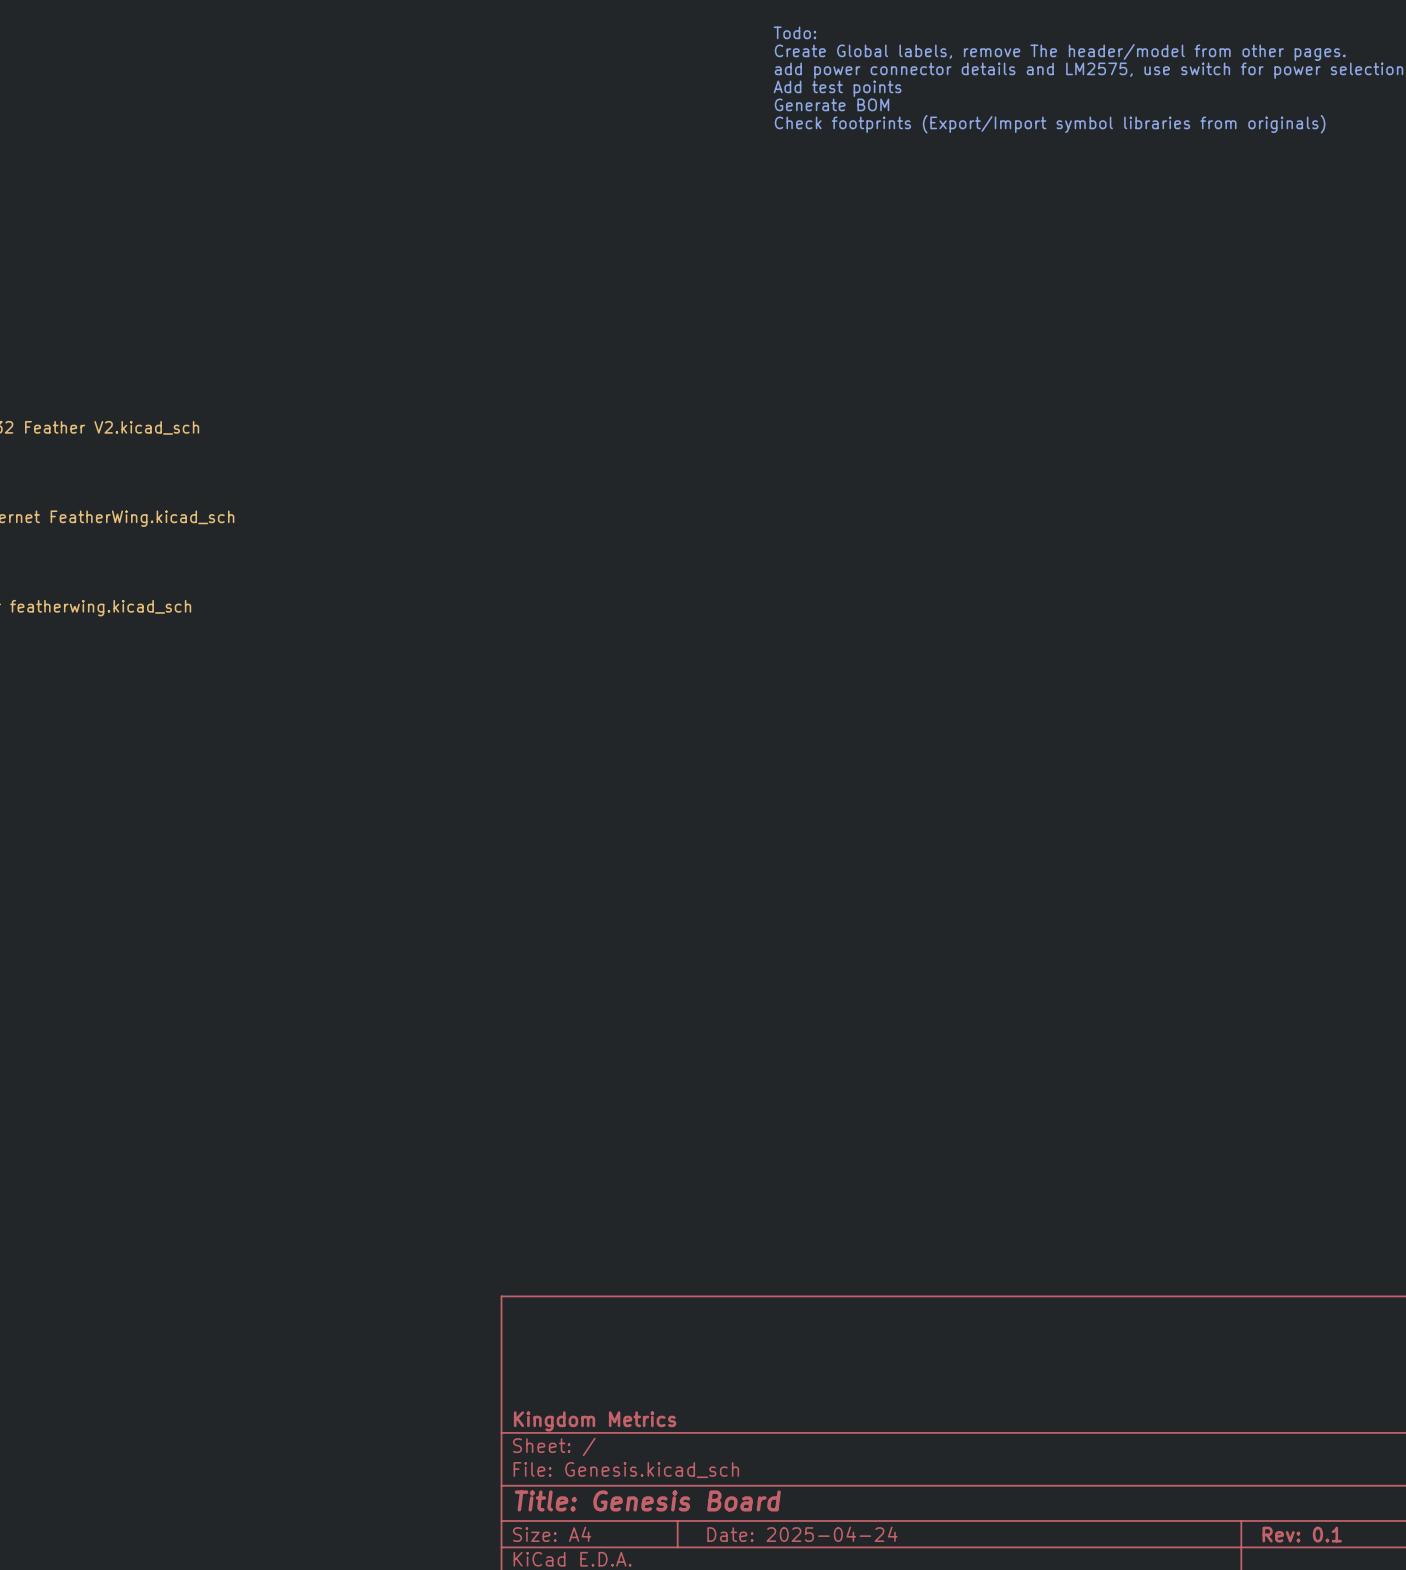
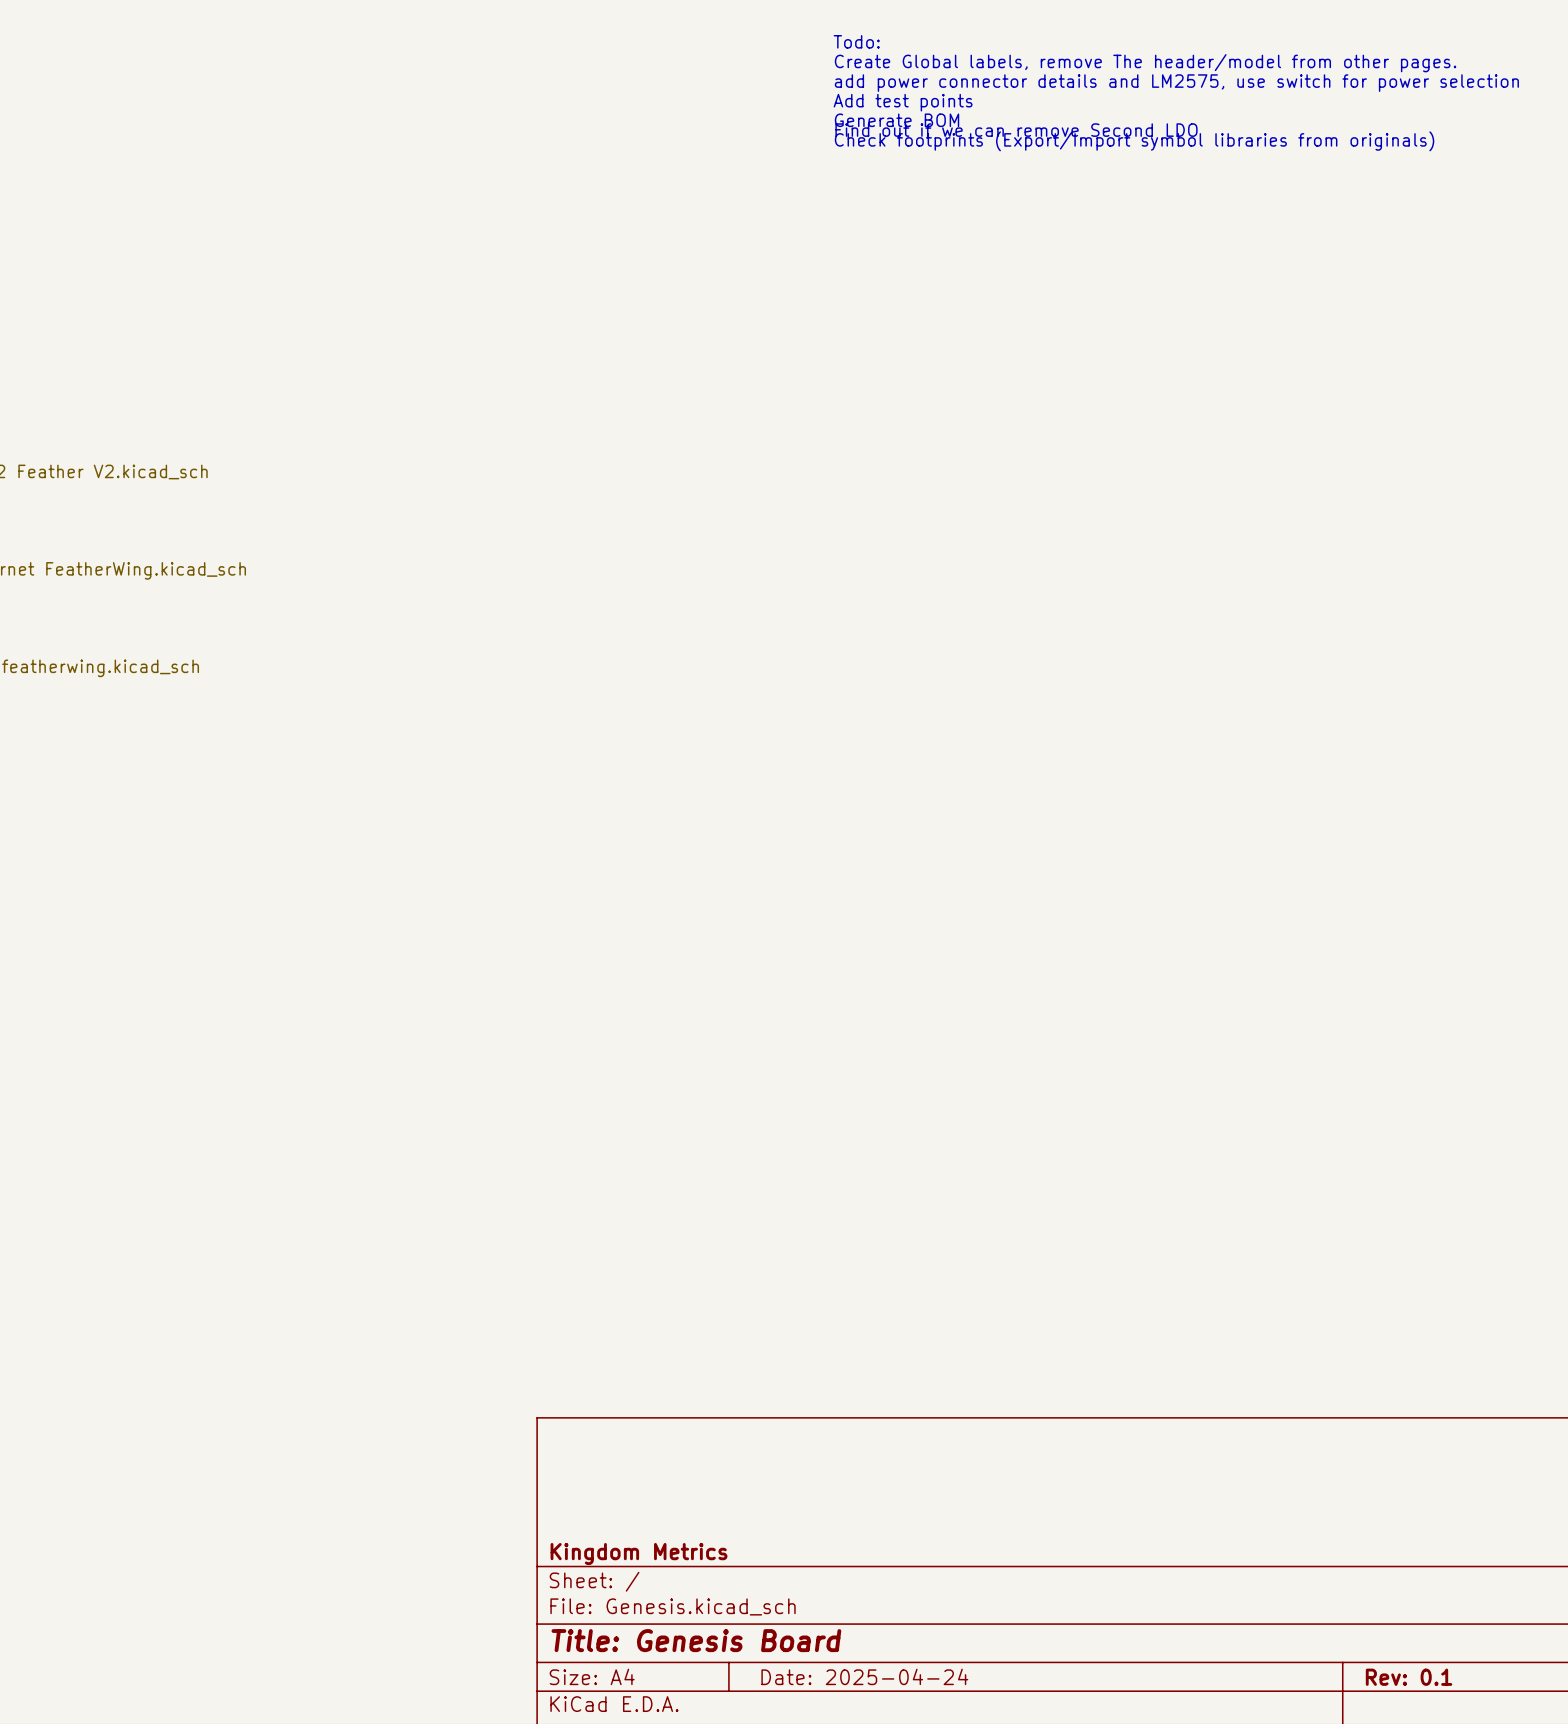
text: none -> Find out if we can remove Second LDO (1016, 130)

